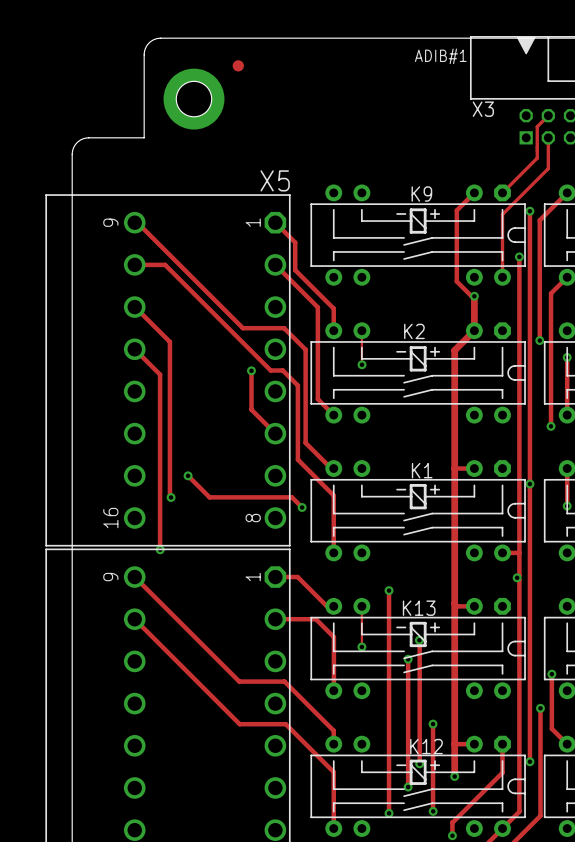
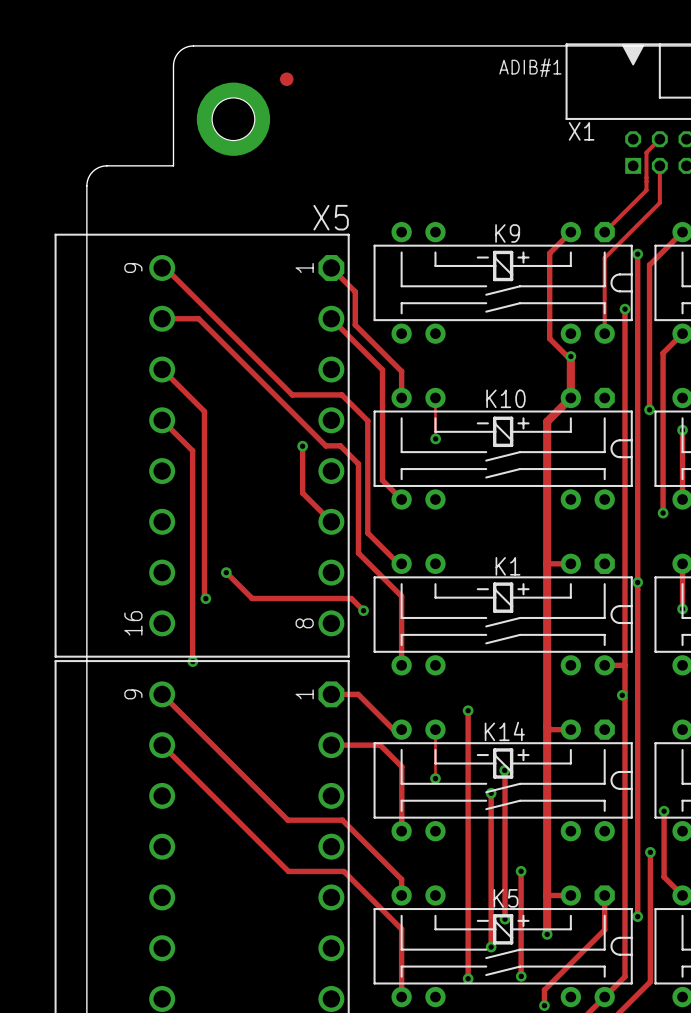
X3 name: X3 (483, 109) -> X1 (581, 131)
K2 name: K2 (414, 331) -> K10 (505, 398)
K13 name: K13 (419, 608) -> K14 (504, 731)
K12 name: K12 (426, 746) -> K5 (505, 898)

